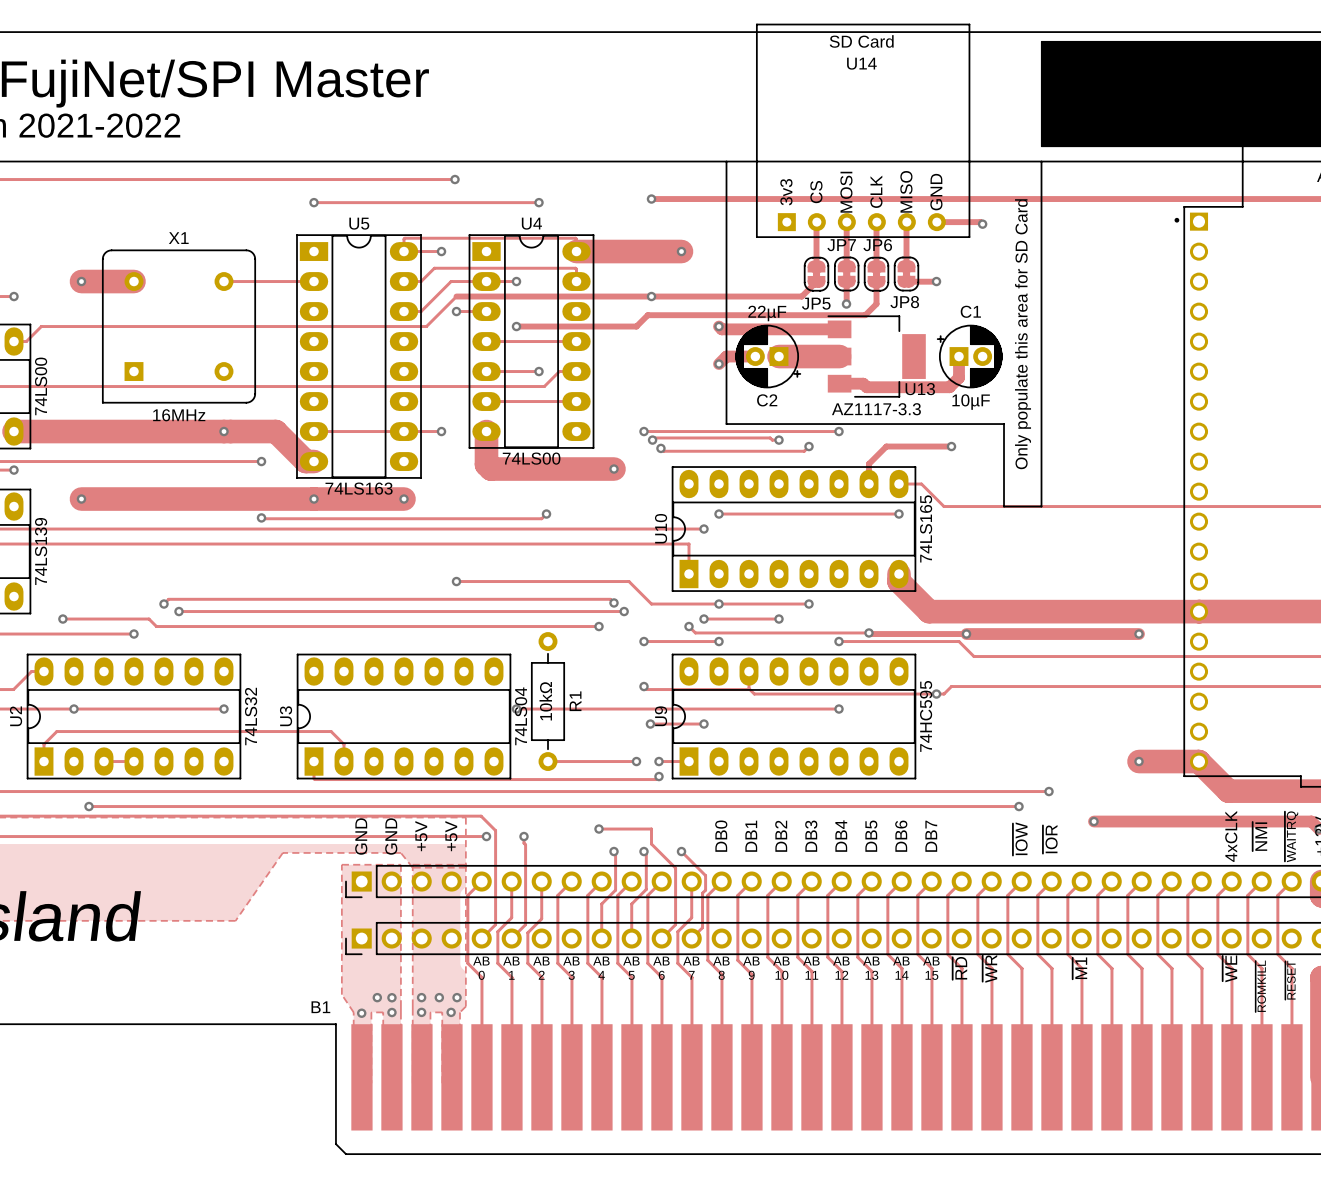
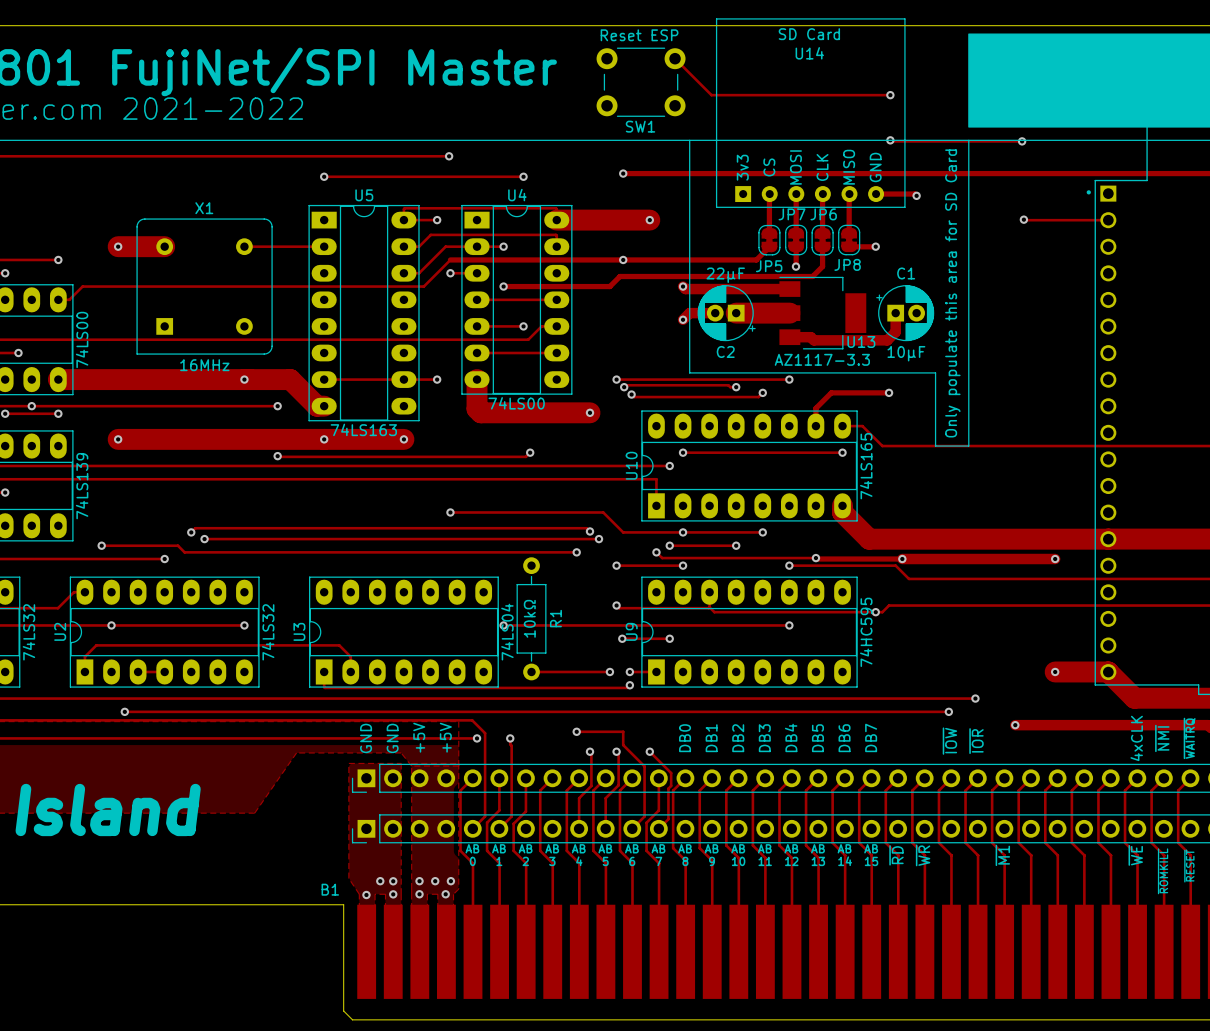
track: none -> (675, 58) (711, 95) (890, 95)
SW1: none -> Reset ESP (641, 82)
via: none -> (890, 95)
track: none -> (890, 140) (1022, 141)
via: none -> (890, 140)
via: none -> (1022, 141)
track: none -> (1023, 219) (1108, 220)
via: none -> (1023, 219)

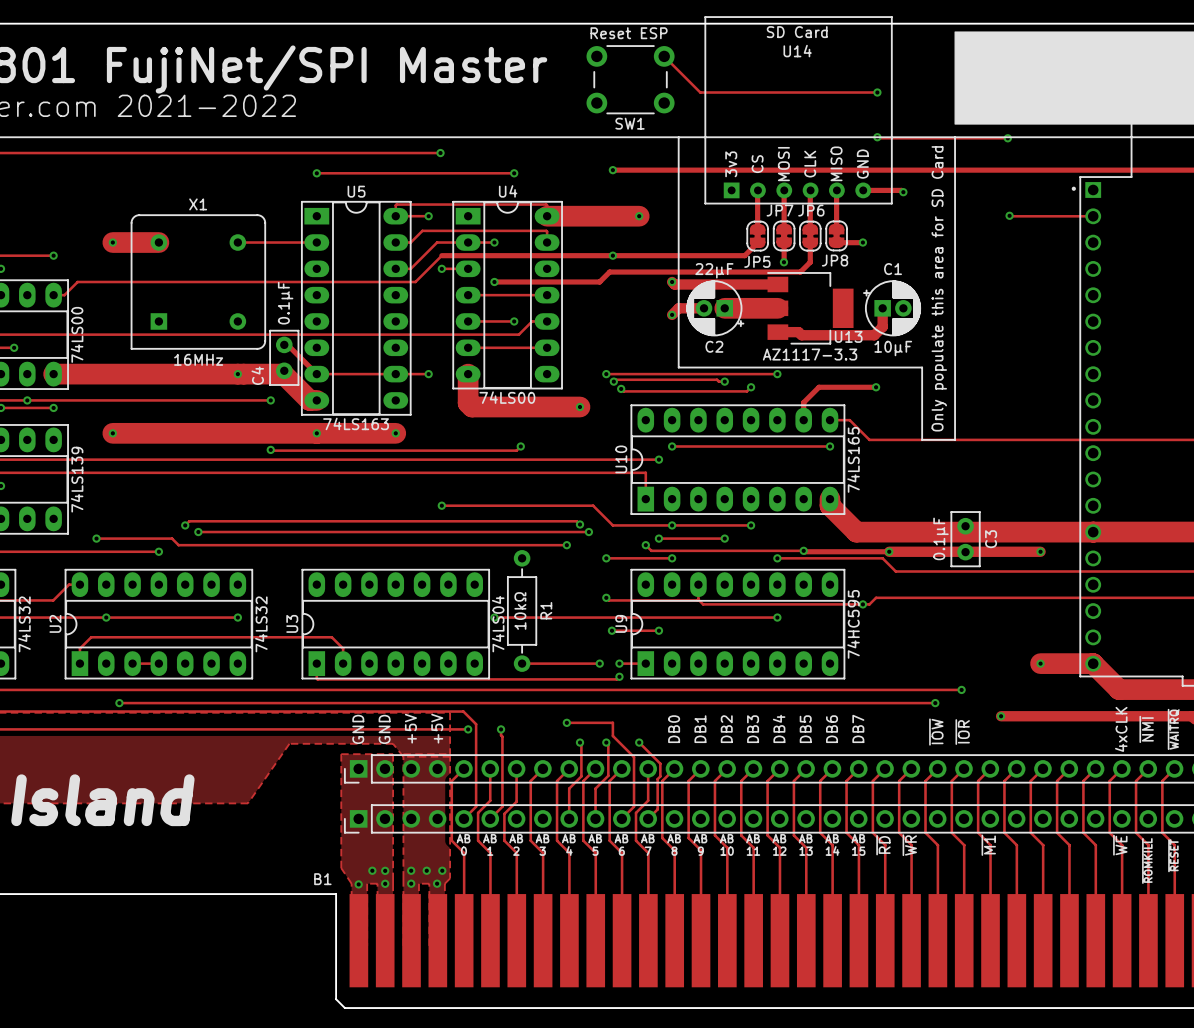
track: none -> (284, 344) (287, 344) (316, 374)
C4: none -> 0.1µF (284, 357)
C3: none -> 0.1µF (965, 539)

